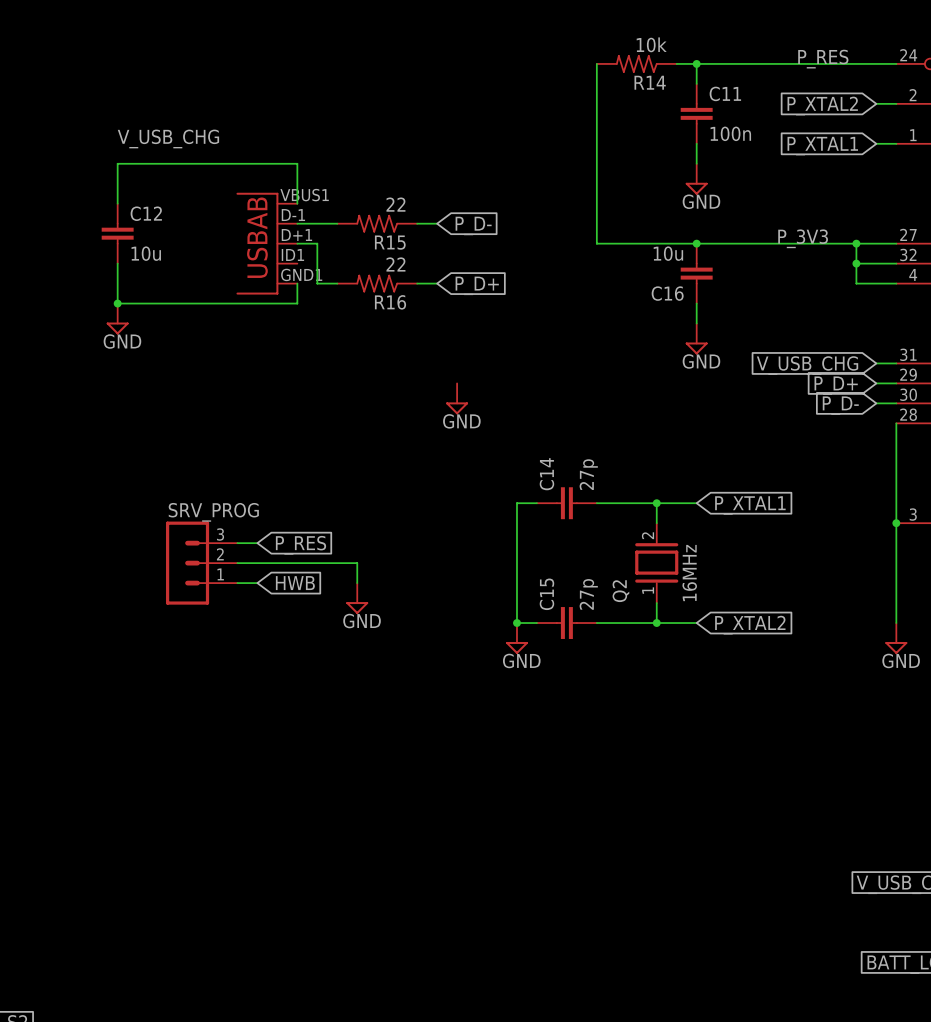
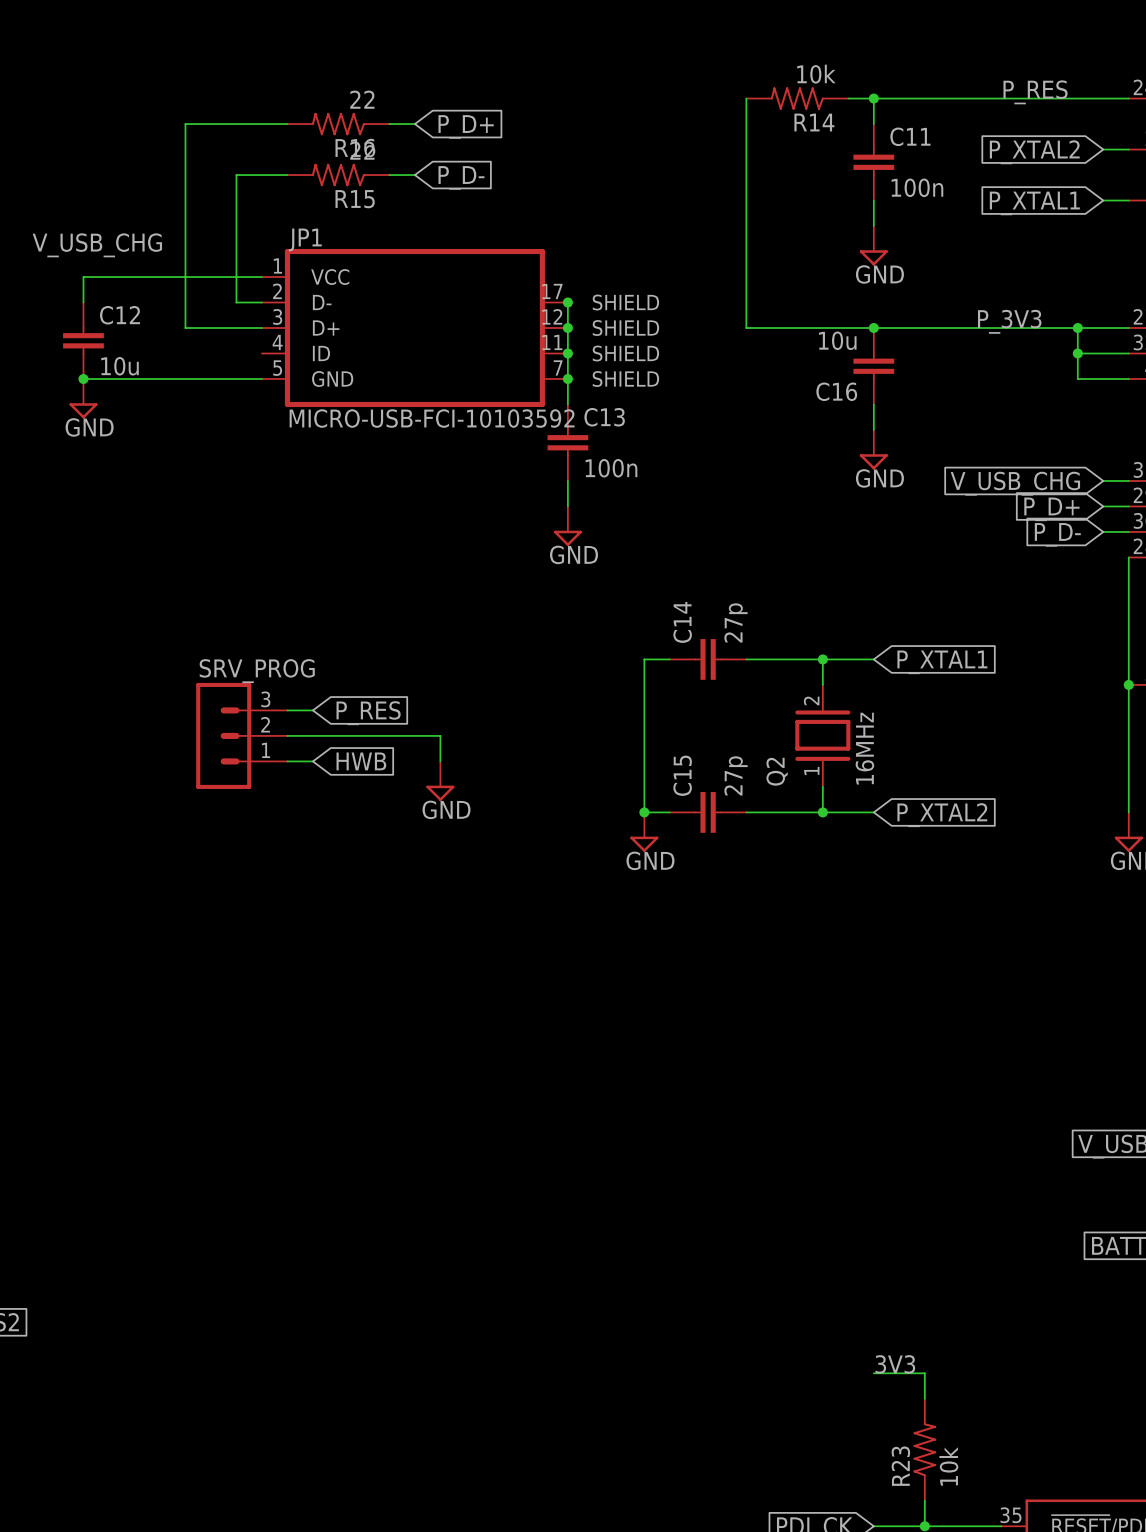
wire: none -> (287, 124) (185, 124) (185, 328) (261, 328)
wire: none -> (389, 124) (414, 124)
global label: none -> P_D+ (466, 126)
wire: none -> (287, 175) (236, 175) (236, 302) (261, 302)
label position: V_USB_CHG (168, 138) -> V_USB_CHG (97, 245)
wire: (117, 203) (117, 163) (297, 163) (297, 203) -> none
wire: none -> (261, 277) (83, 277) (83, 302)
wire: (297, 223) (337, 223) -> none
R15 position: (377, 223) -> (338, 175)
wire: (417, 223) (437, 223) -> (389, 175) (414, 175)
wire: none -> (567, 302) (567, 404)
junction: none -> (567, 302)
global label position: P_D- (473, 225) -> P_D- (461, 177)
C12 position: (117, 233) -> (83, 340)
part: (266, 243) -> none
wire: (297, 243) (317, 243) (317, 283) (337, 283) -> none
JP1: none -> MICRO-USB-FCI-10103592 (414, 328)
junction: none -> (567, 328)
wire: (117, 263) (117, 303) (297, 303) (297, 283) -> none
junction: none -> (567, 353)
wire: none -> (83, 379) (261, 379)
R16 position: (377, 283) -> (338, 124)
wire: (417, 283) (437, 283) -> none
junction: none -> (567, 379)
global label: P_D+ (477, 285) -> none
junction position: (117, 303) -> (83, 379)
power symbol position: GND (117, 319) -> GND (83, 398)
C13: none -> 100n (567, 442)
wire: none -> (567, 480) (567, 506)

